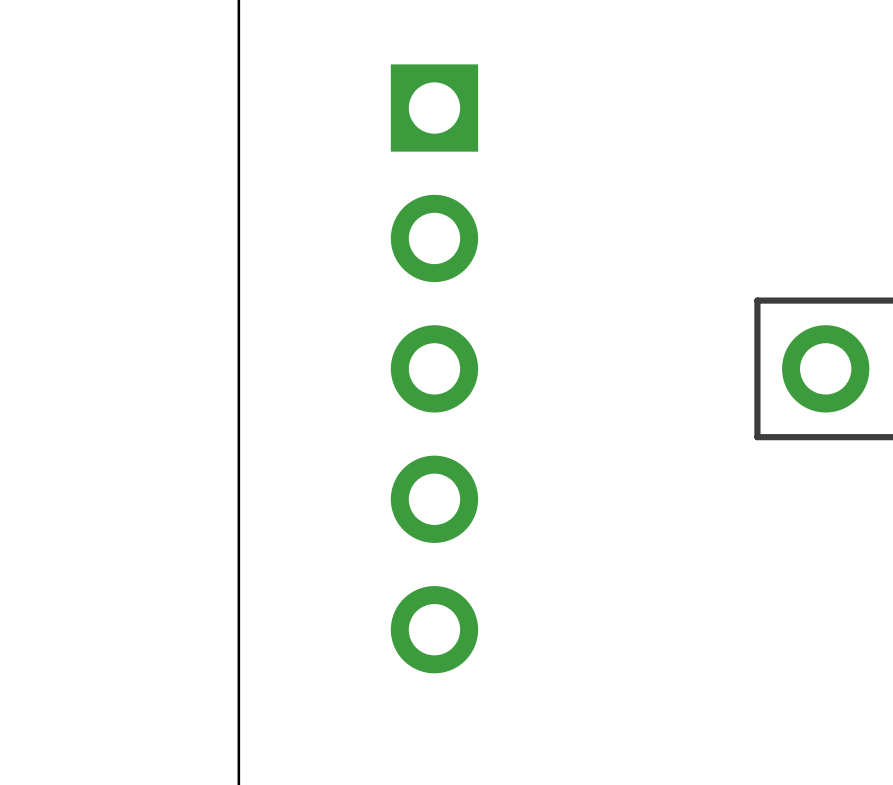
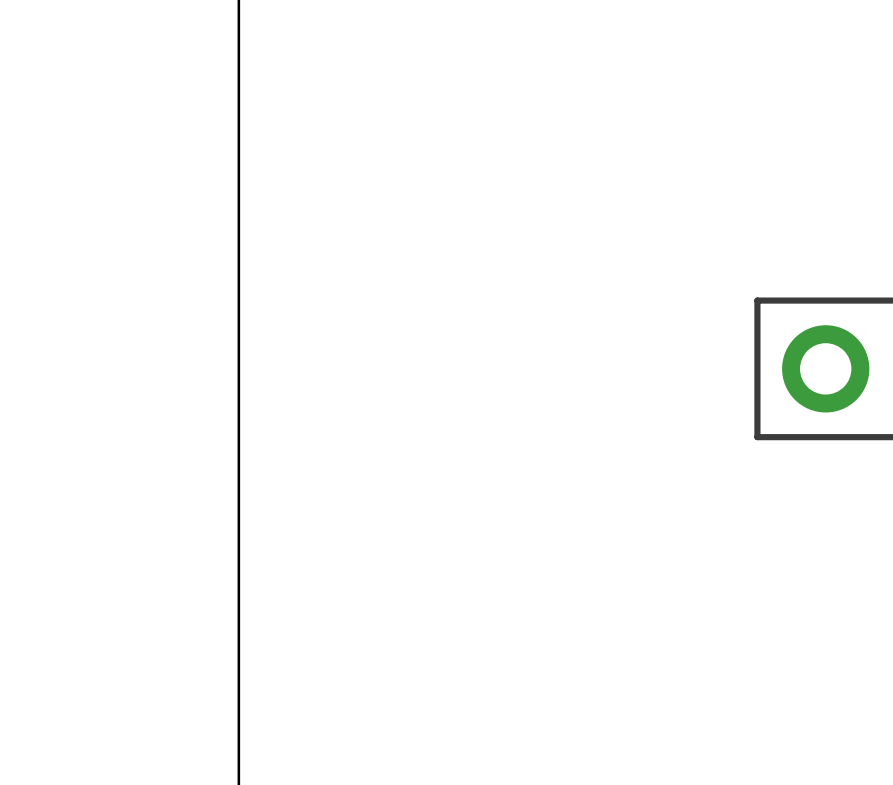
part: (434, 368) -> none

